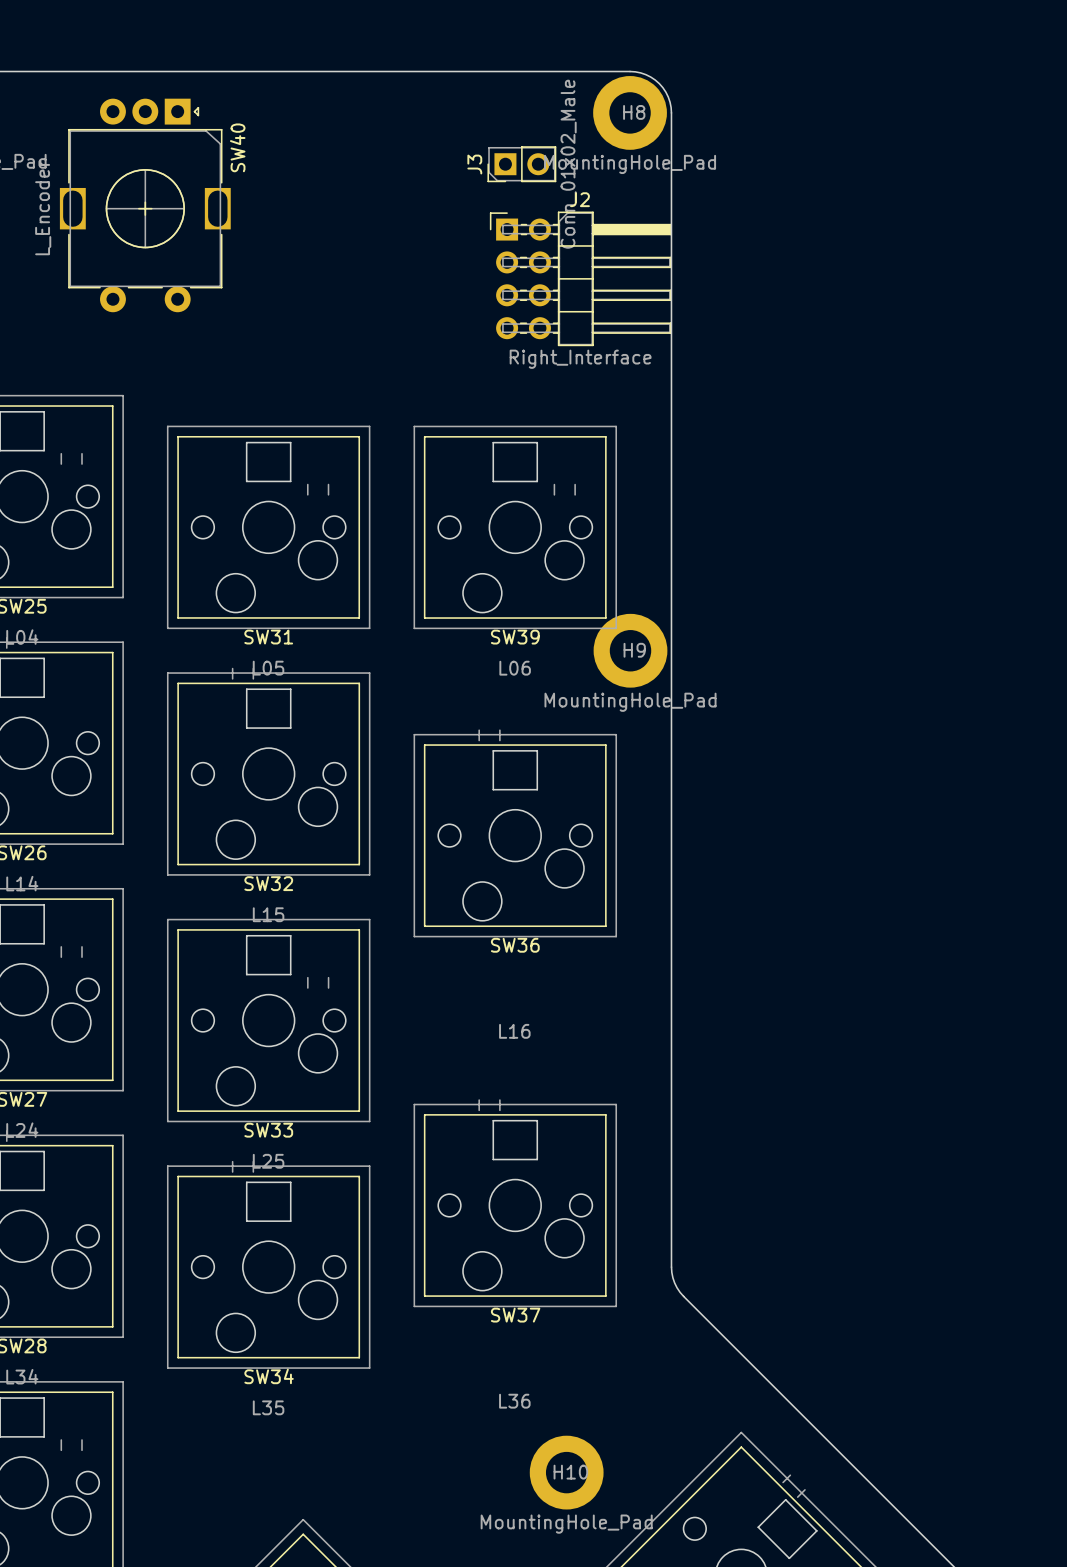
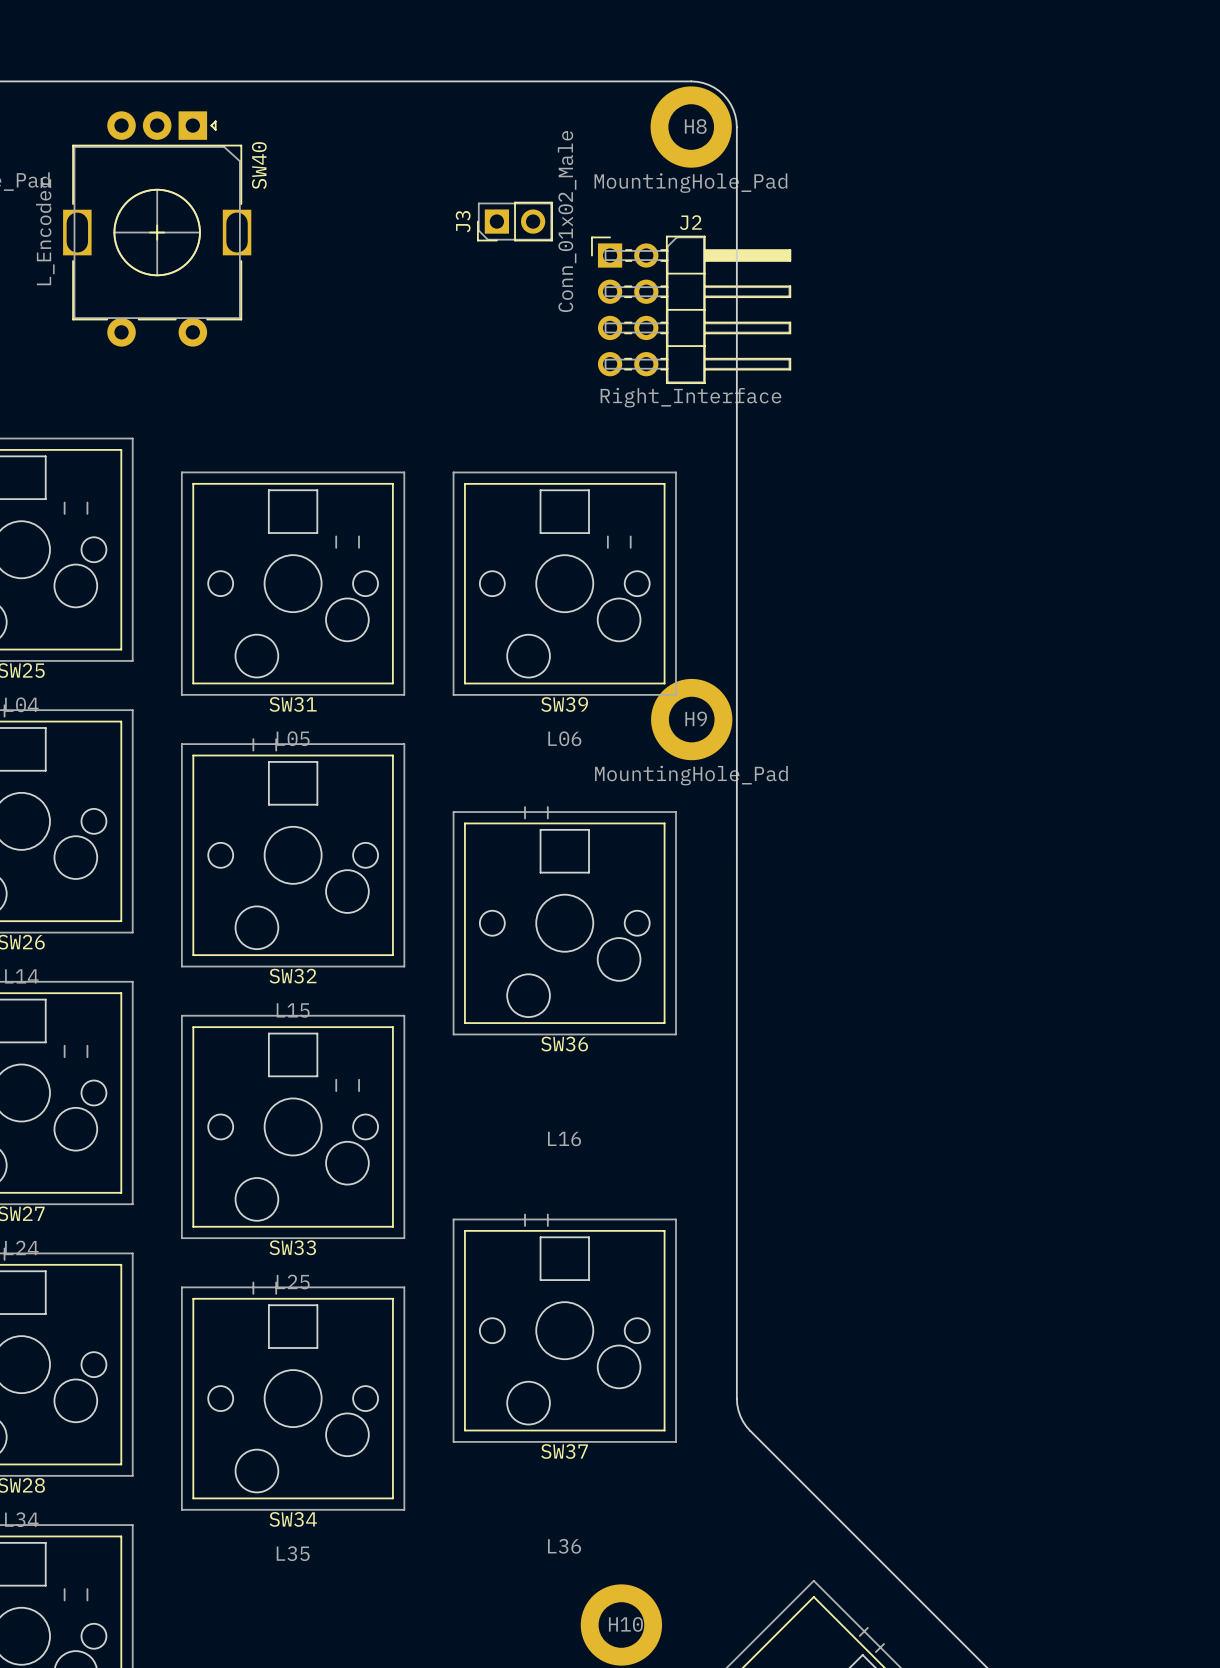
J3 position: (521, 164) -> (515, 221)
J2 position: (580, 278) -> (691, 309)

